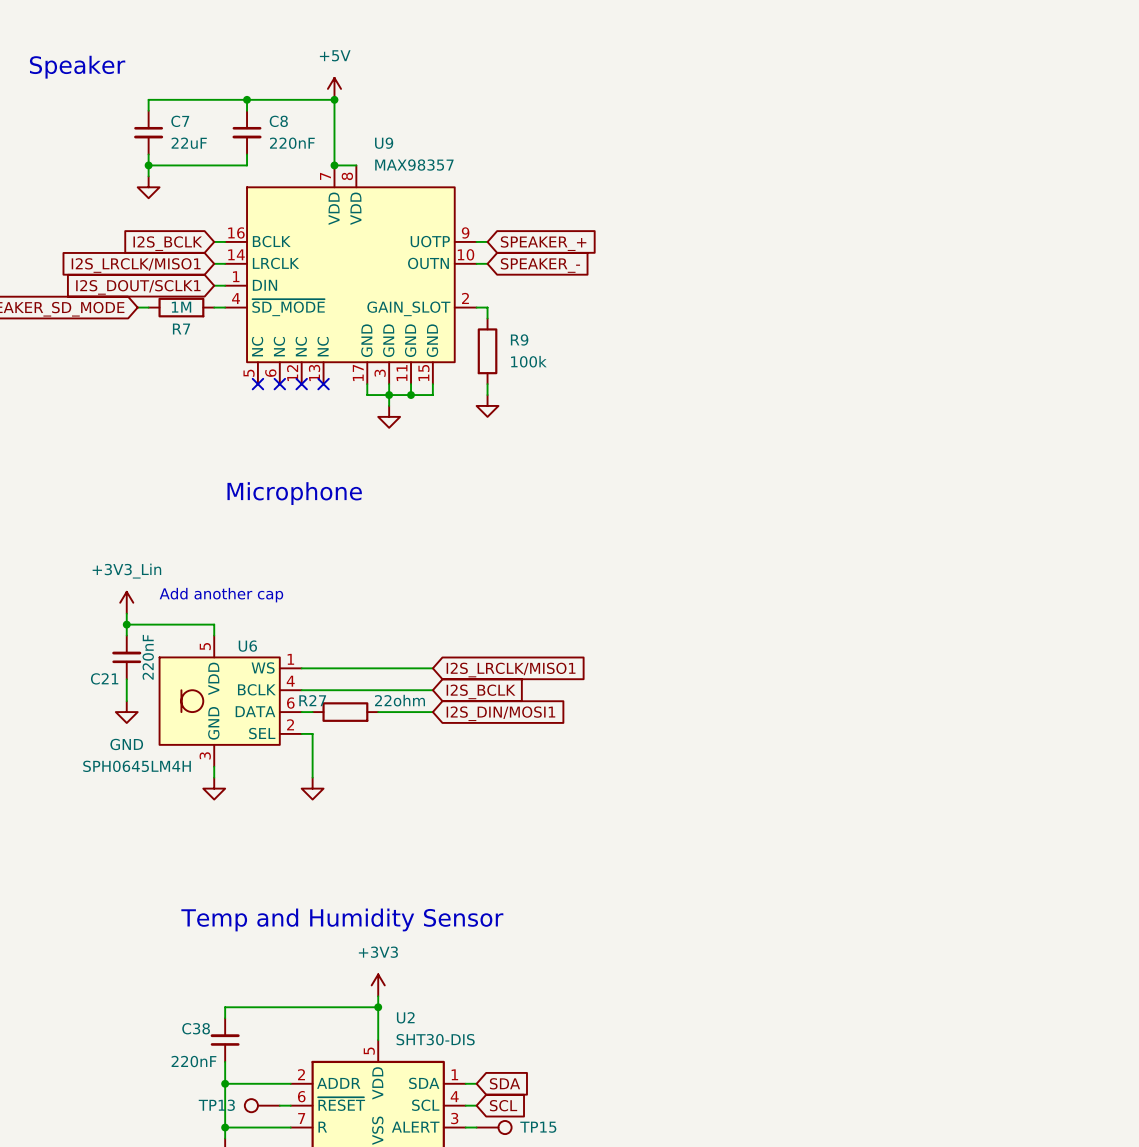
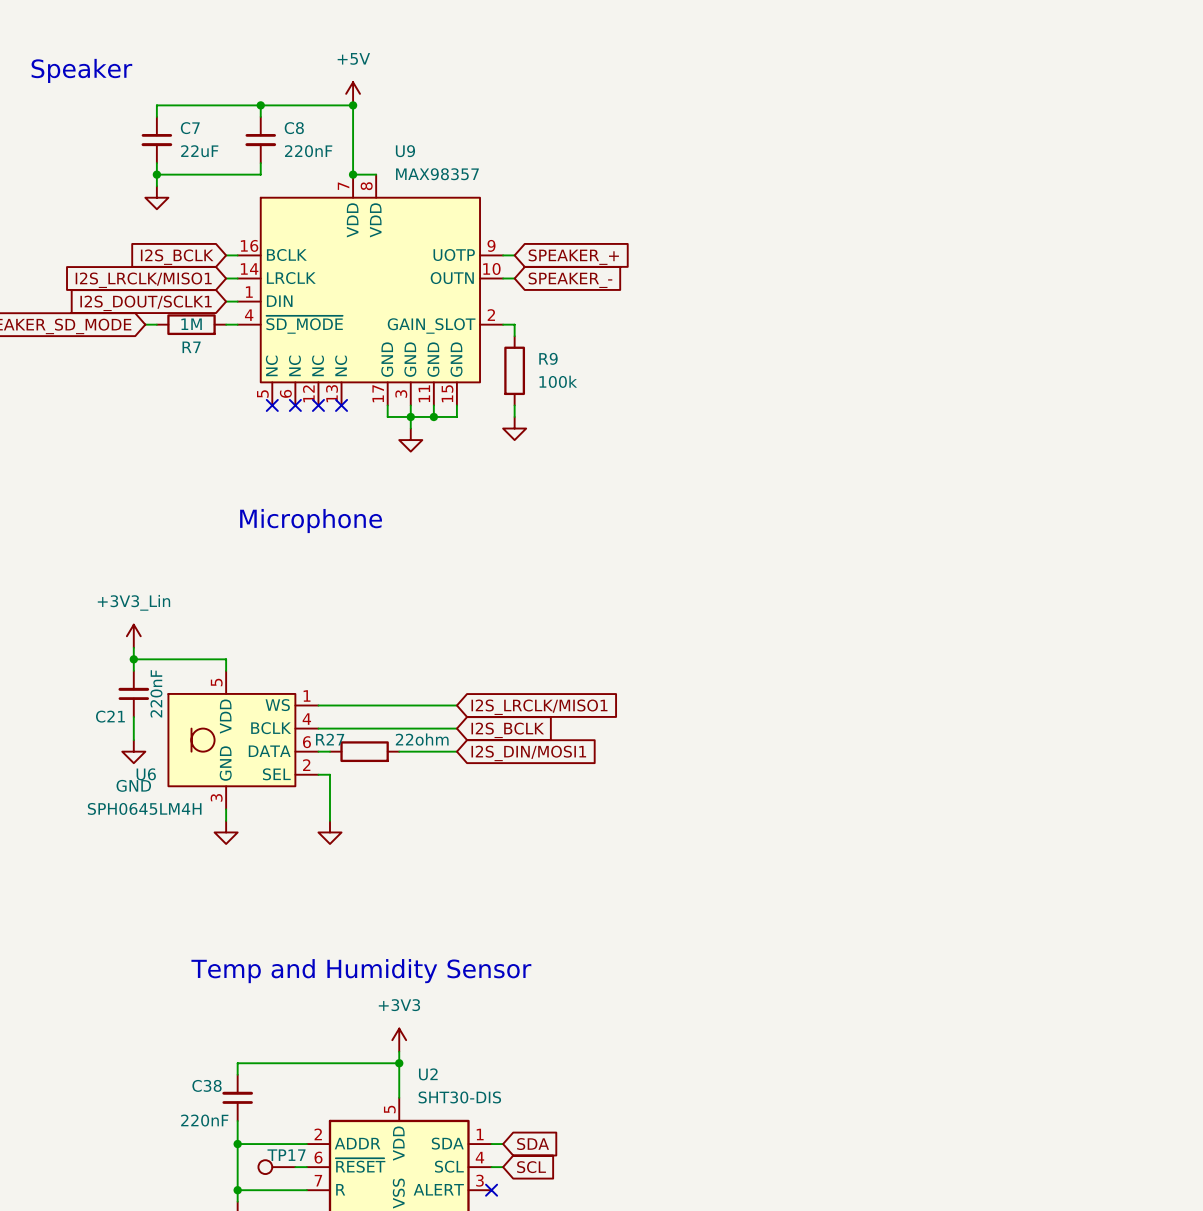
text: Add another cap (221, 595) -> none
U6 name position: U6 (247, 646) -> U6 (146, 774)
TP13 name: TP13 (216, 1105) -> TP17 (286, 1155)
wire: (465, 1127) (476, 1127) -> none
no-connect mark: none -> (491, 1190)
TP15: (494, 1127) -> none

